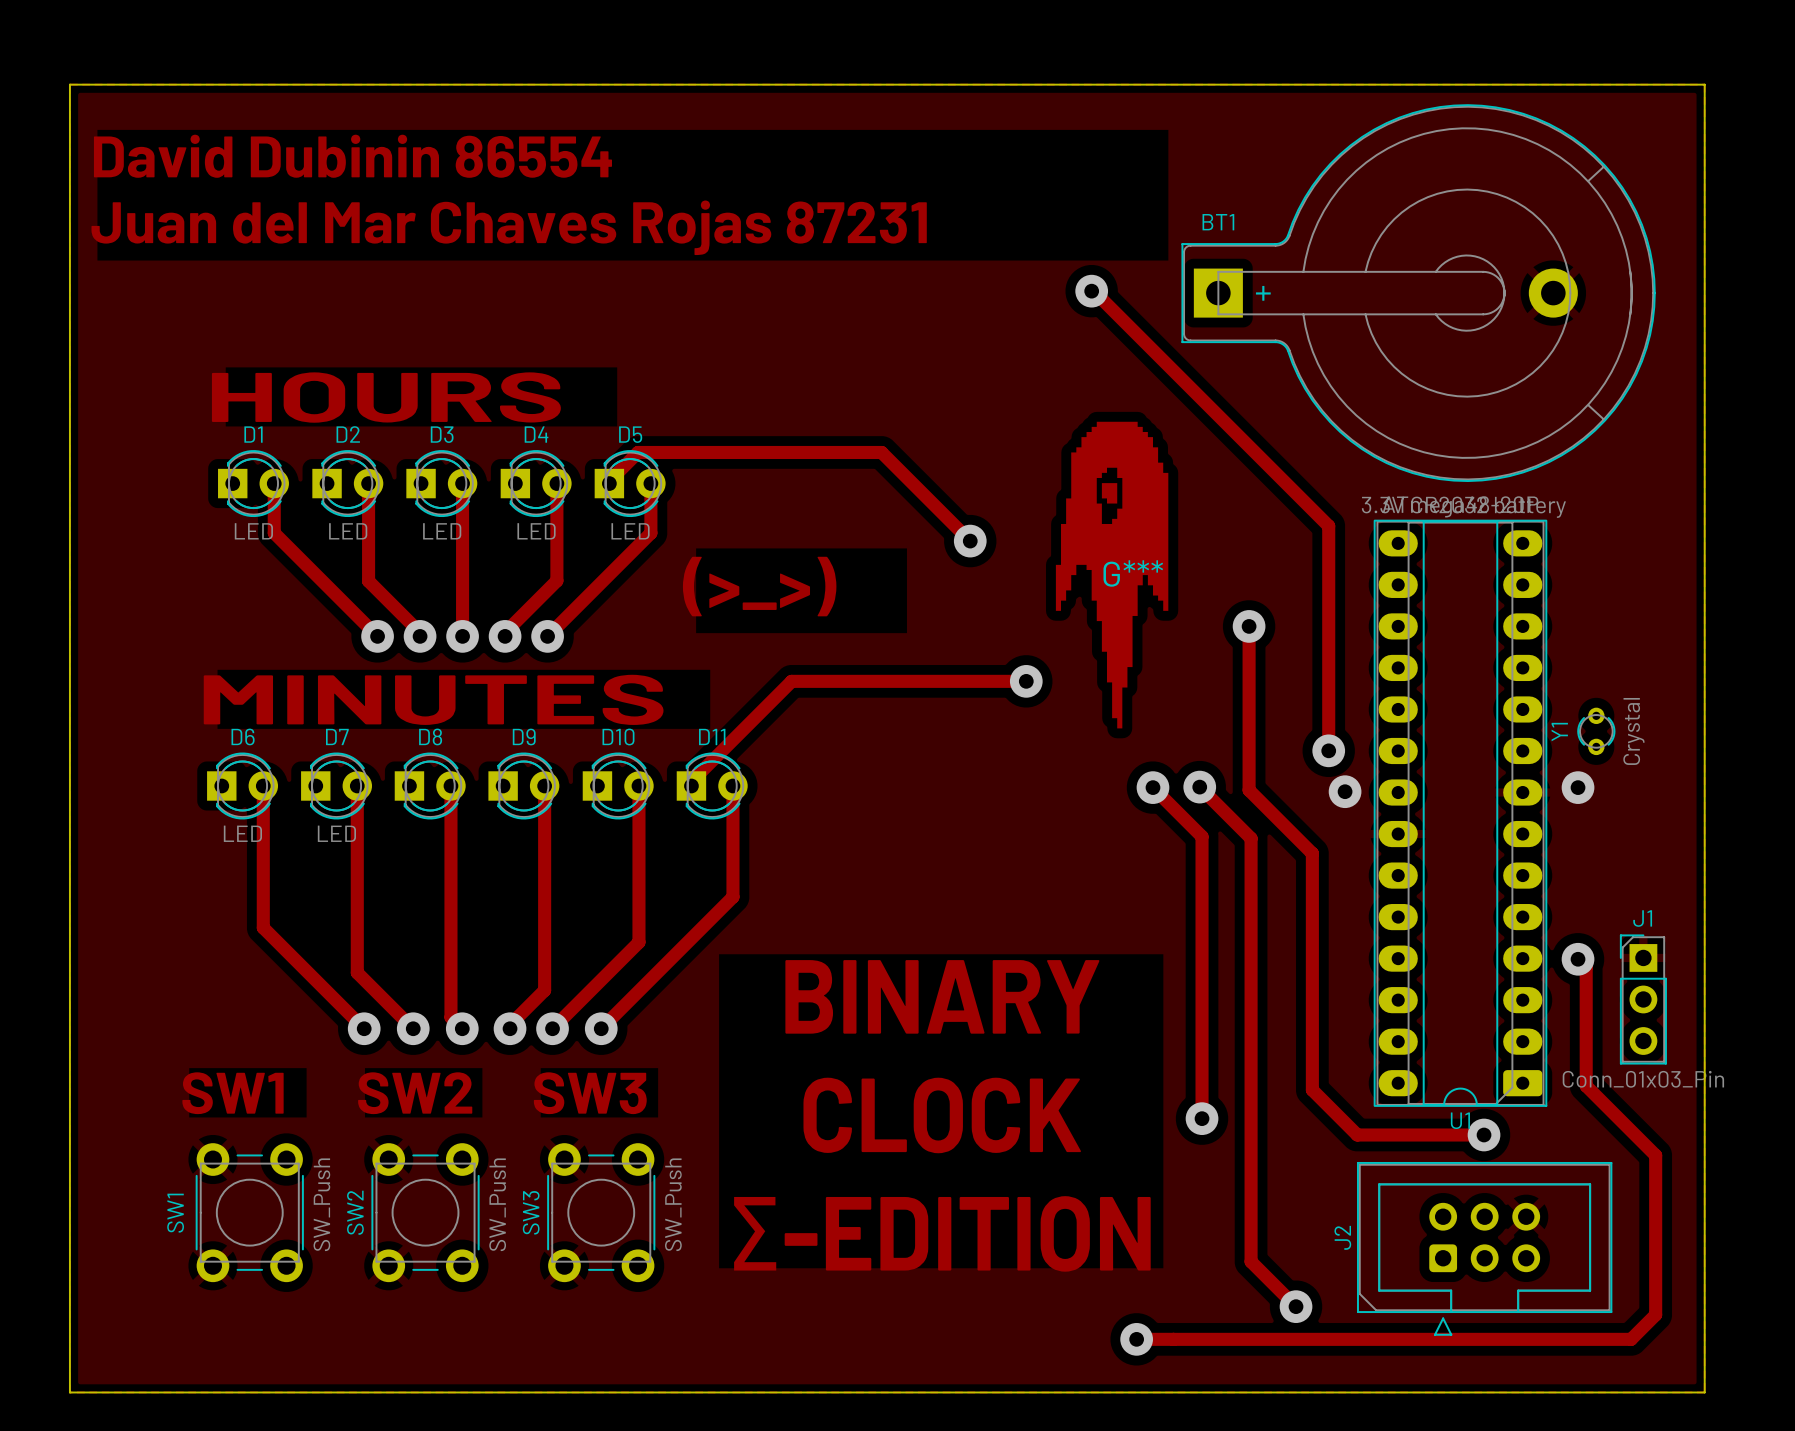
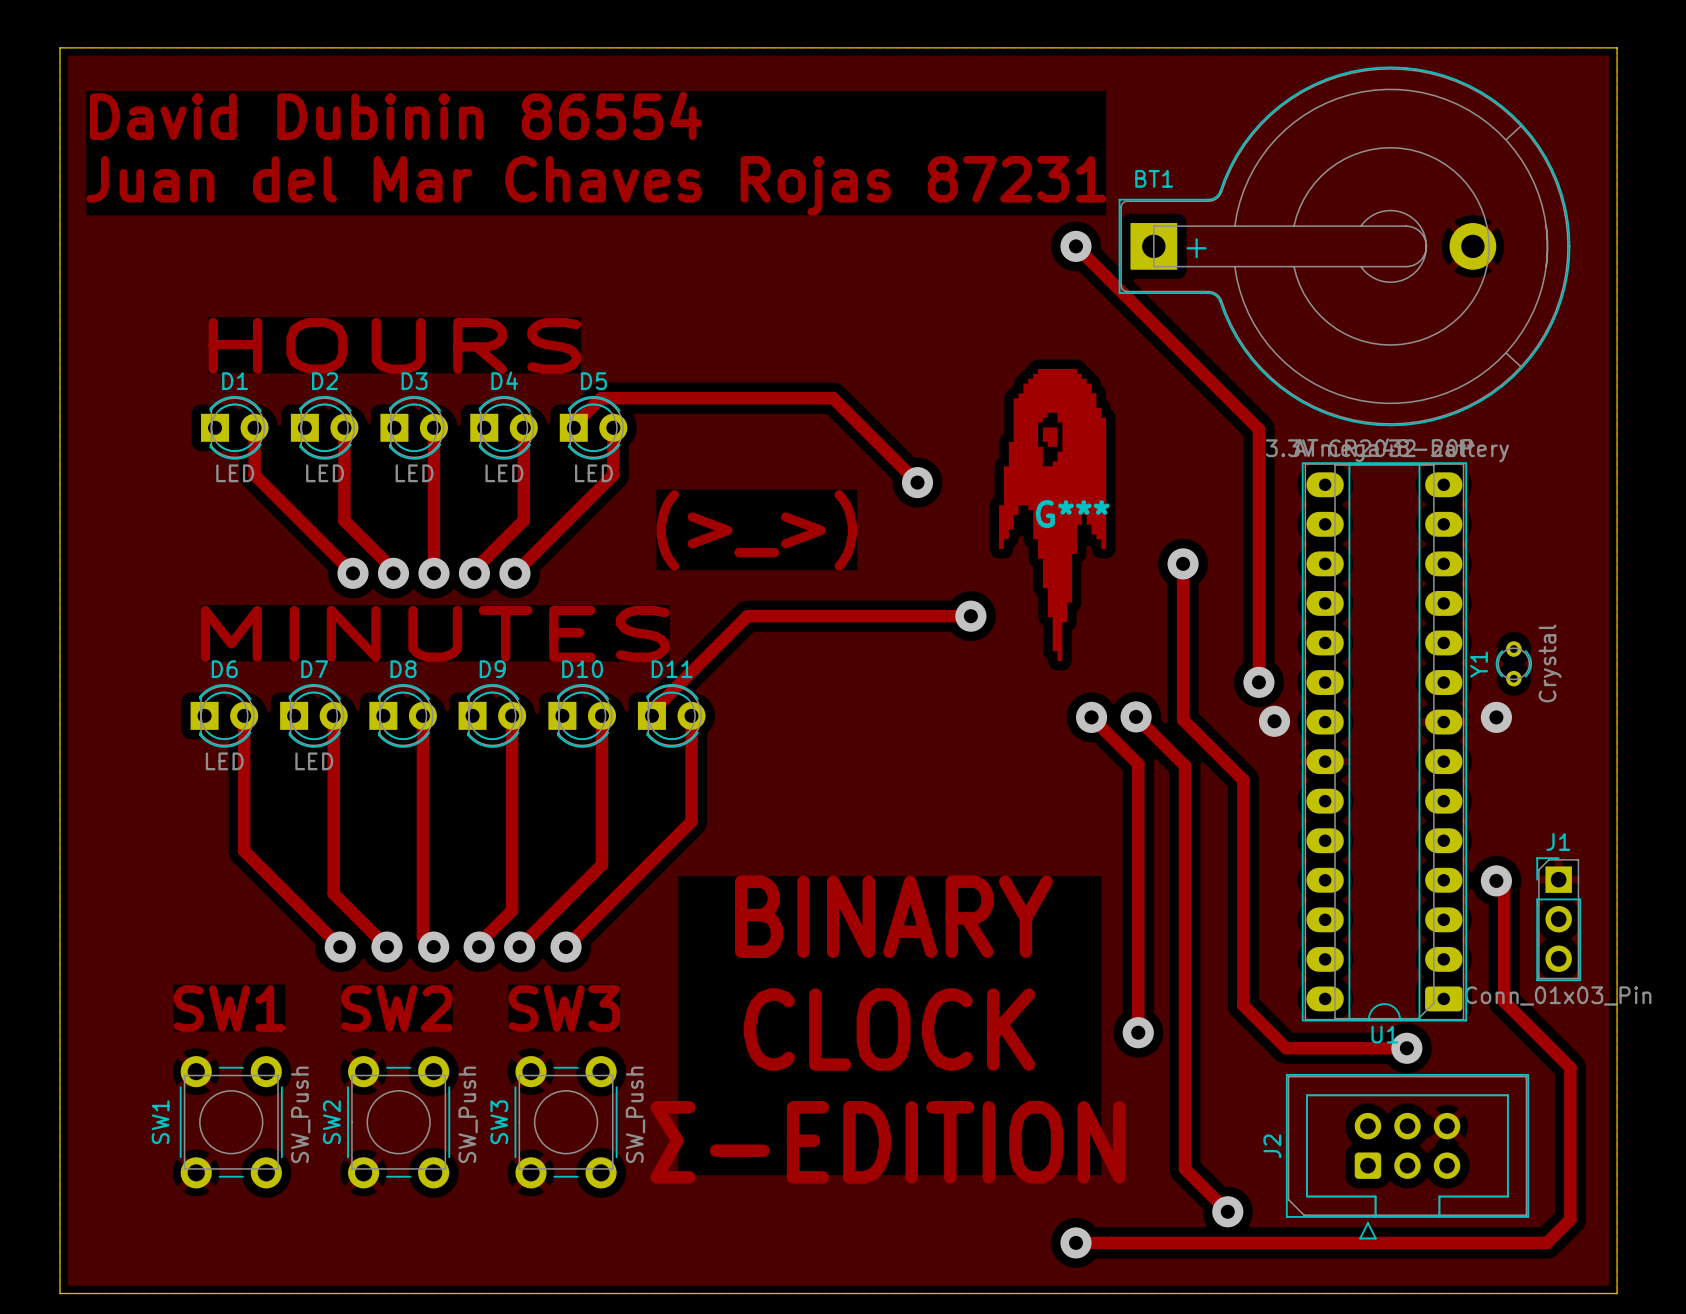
track: (1091, 291) (1093, 291) (1328, 526) -> (1075, 246) (1258, 429) (1258, 468)
via position: (1091, 291) -> (1075, 246)

